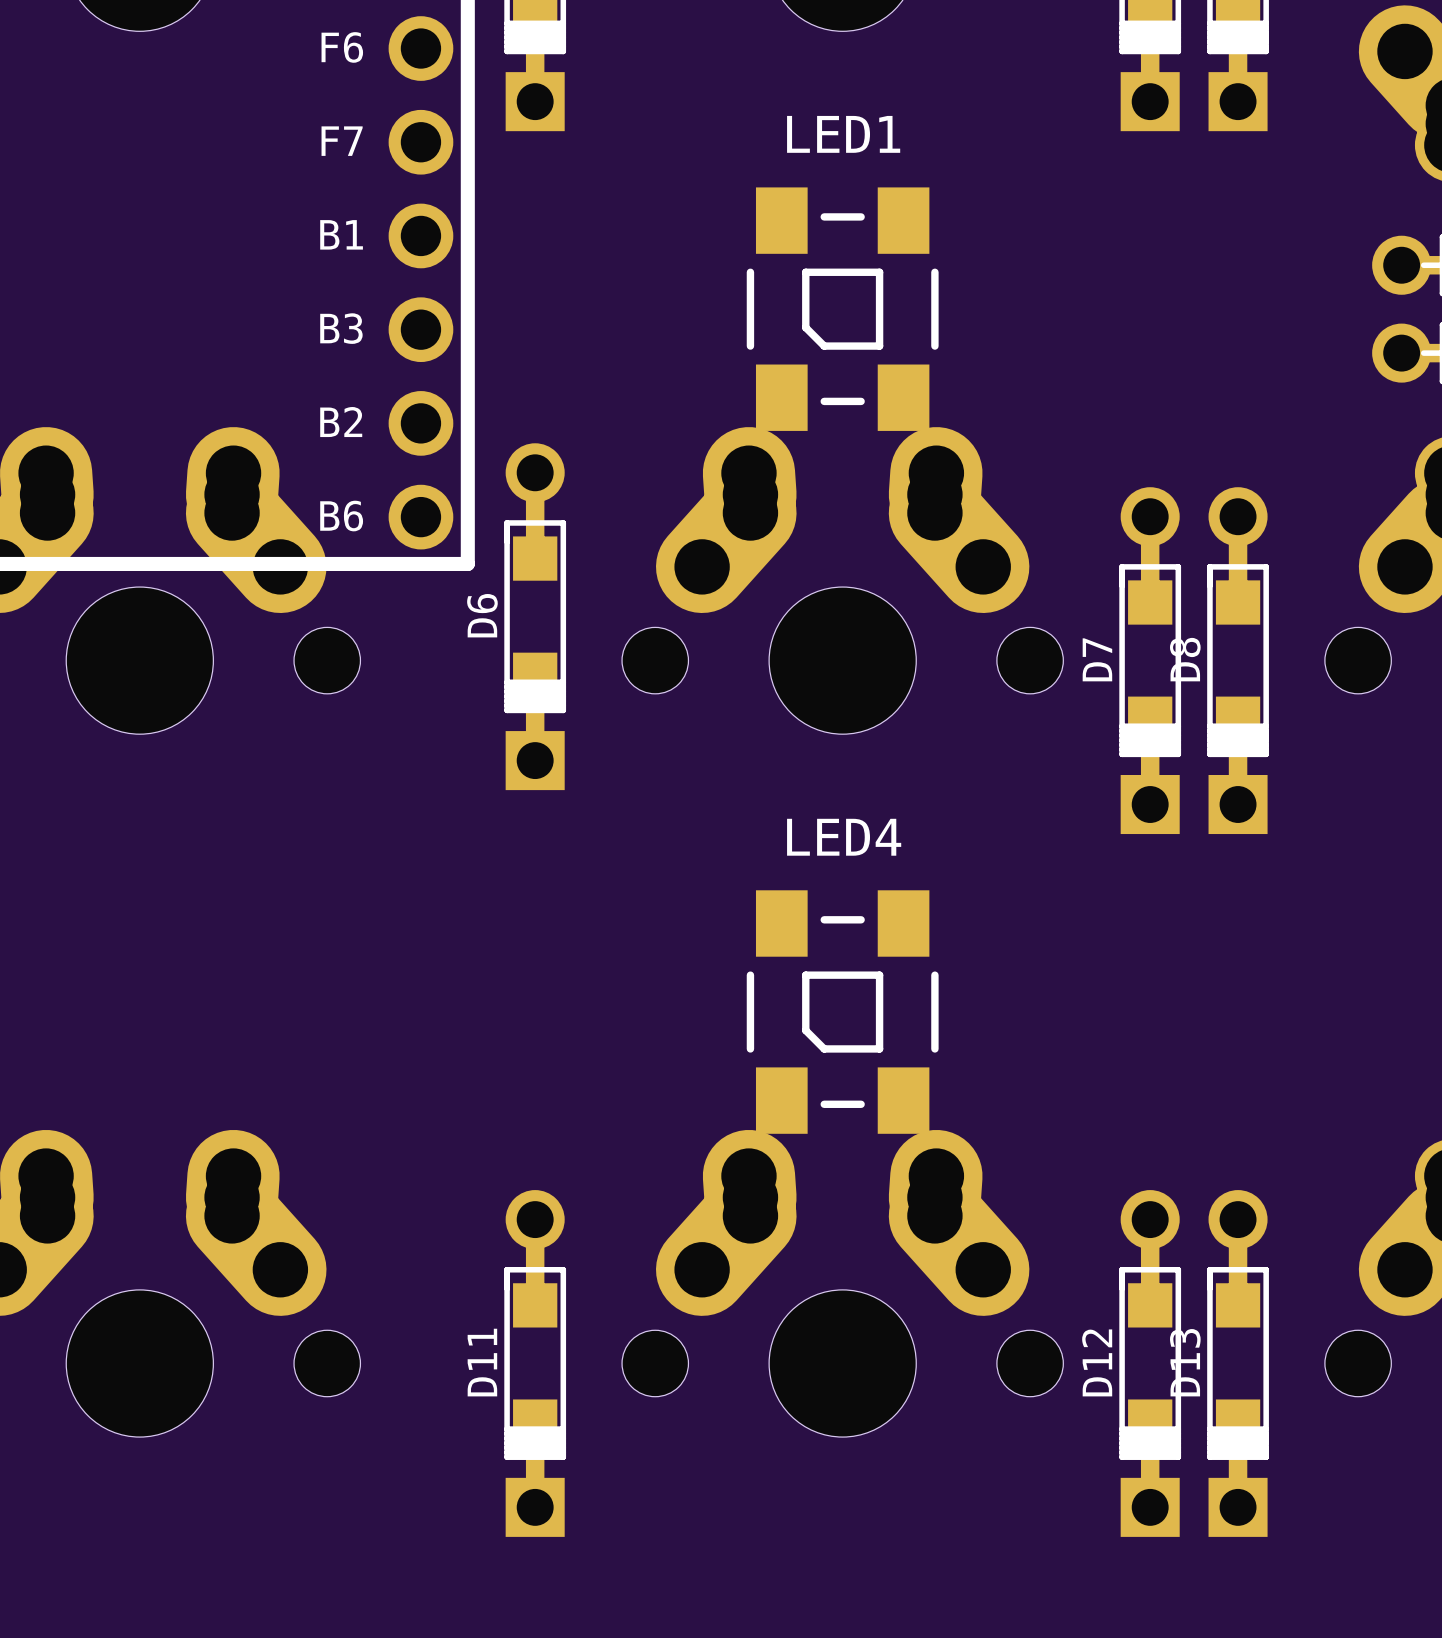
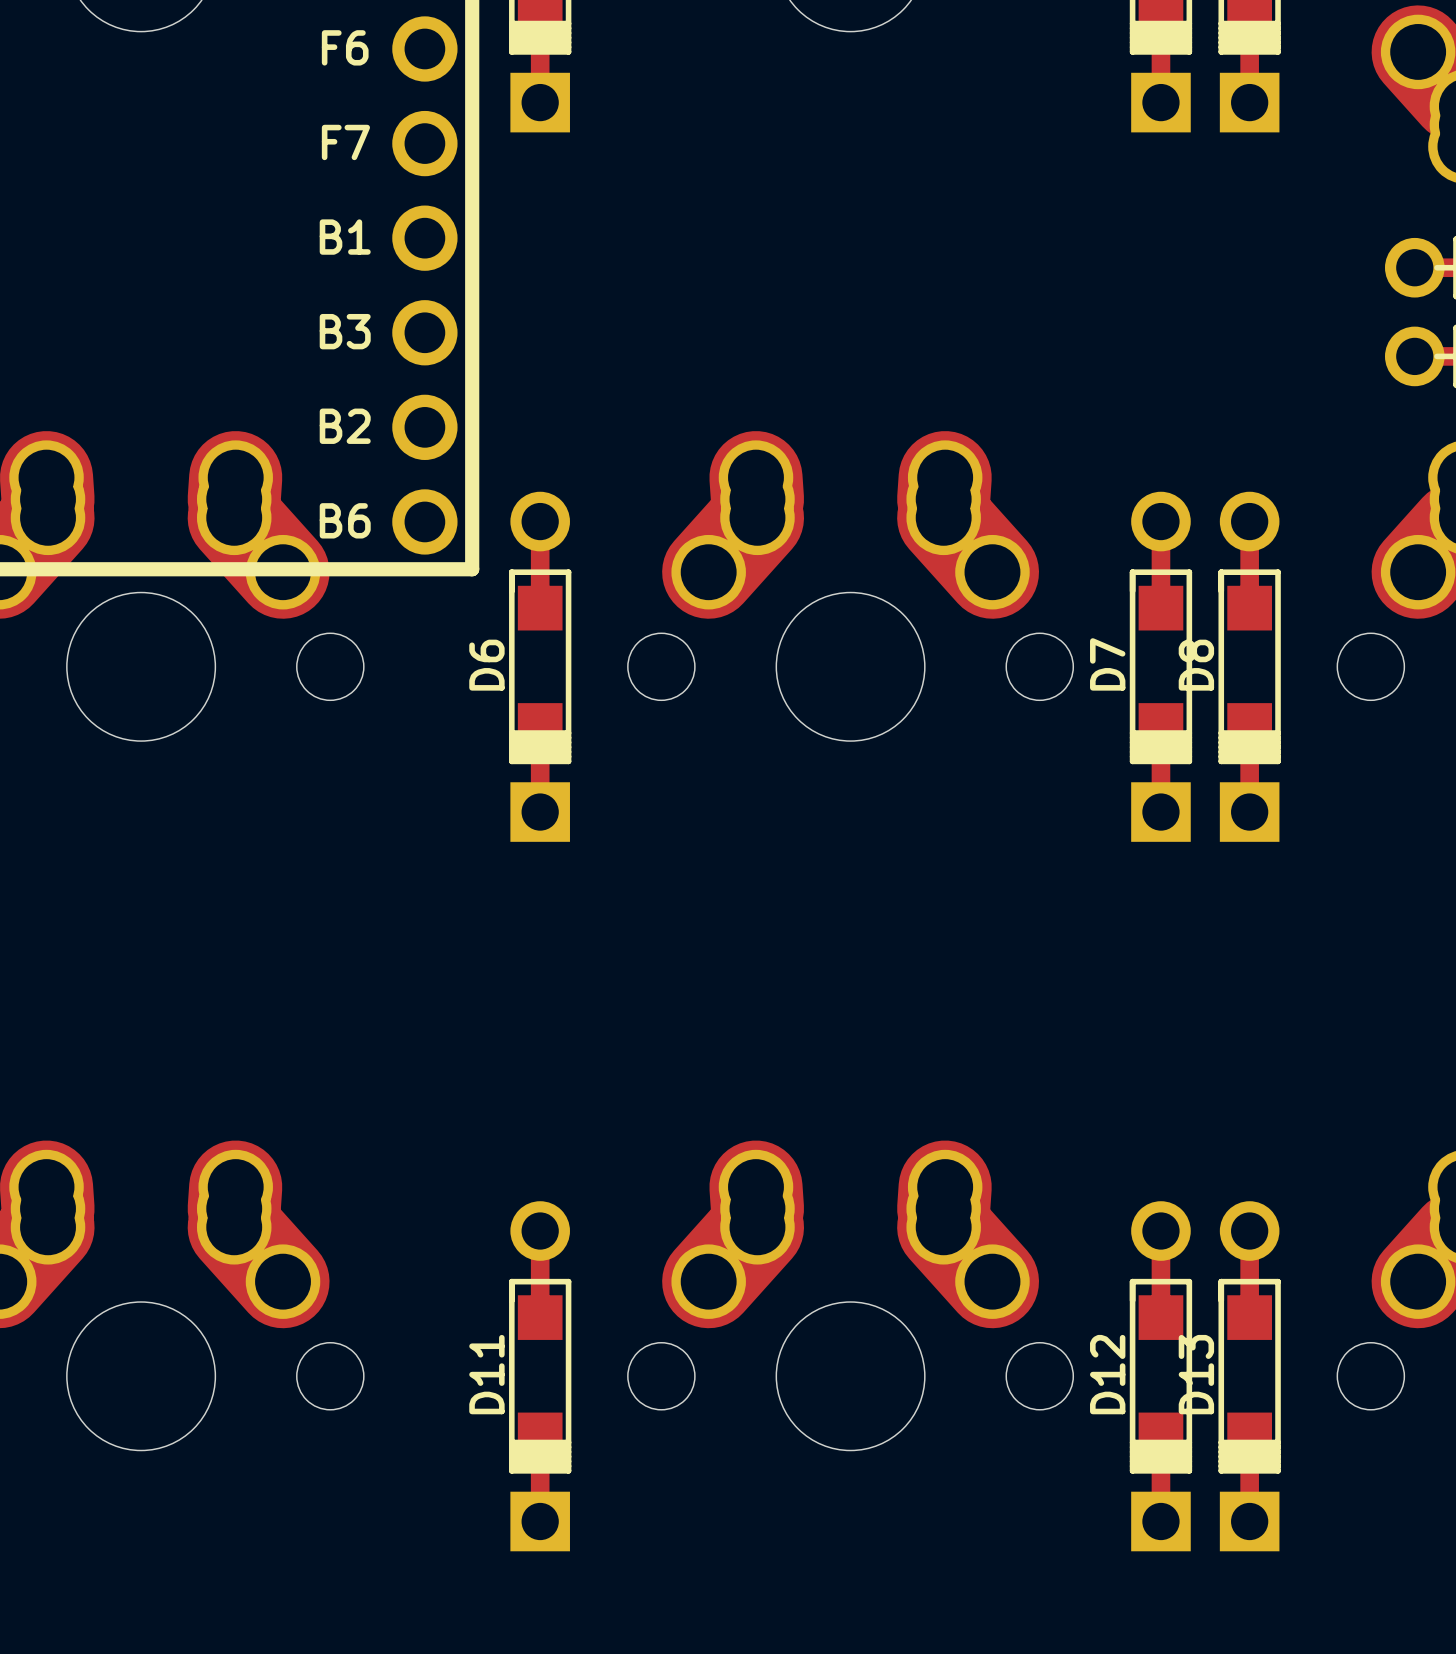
LED1: (842, 309) -> none
D6 position: (535, 616) -> (540, 666)
LED4: (842, 1012) -> none

